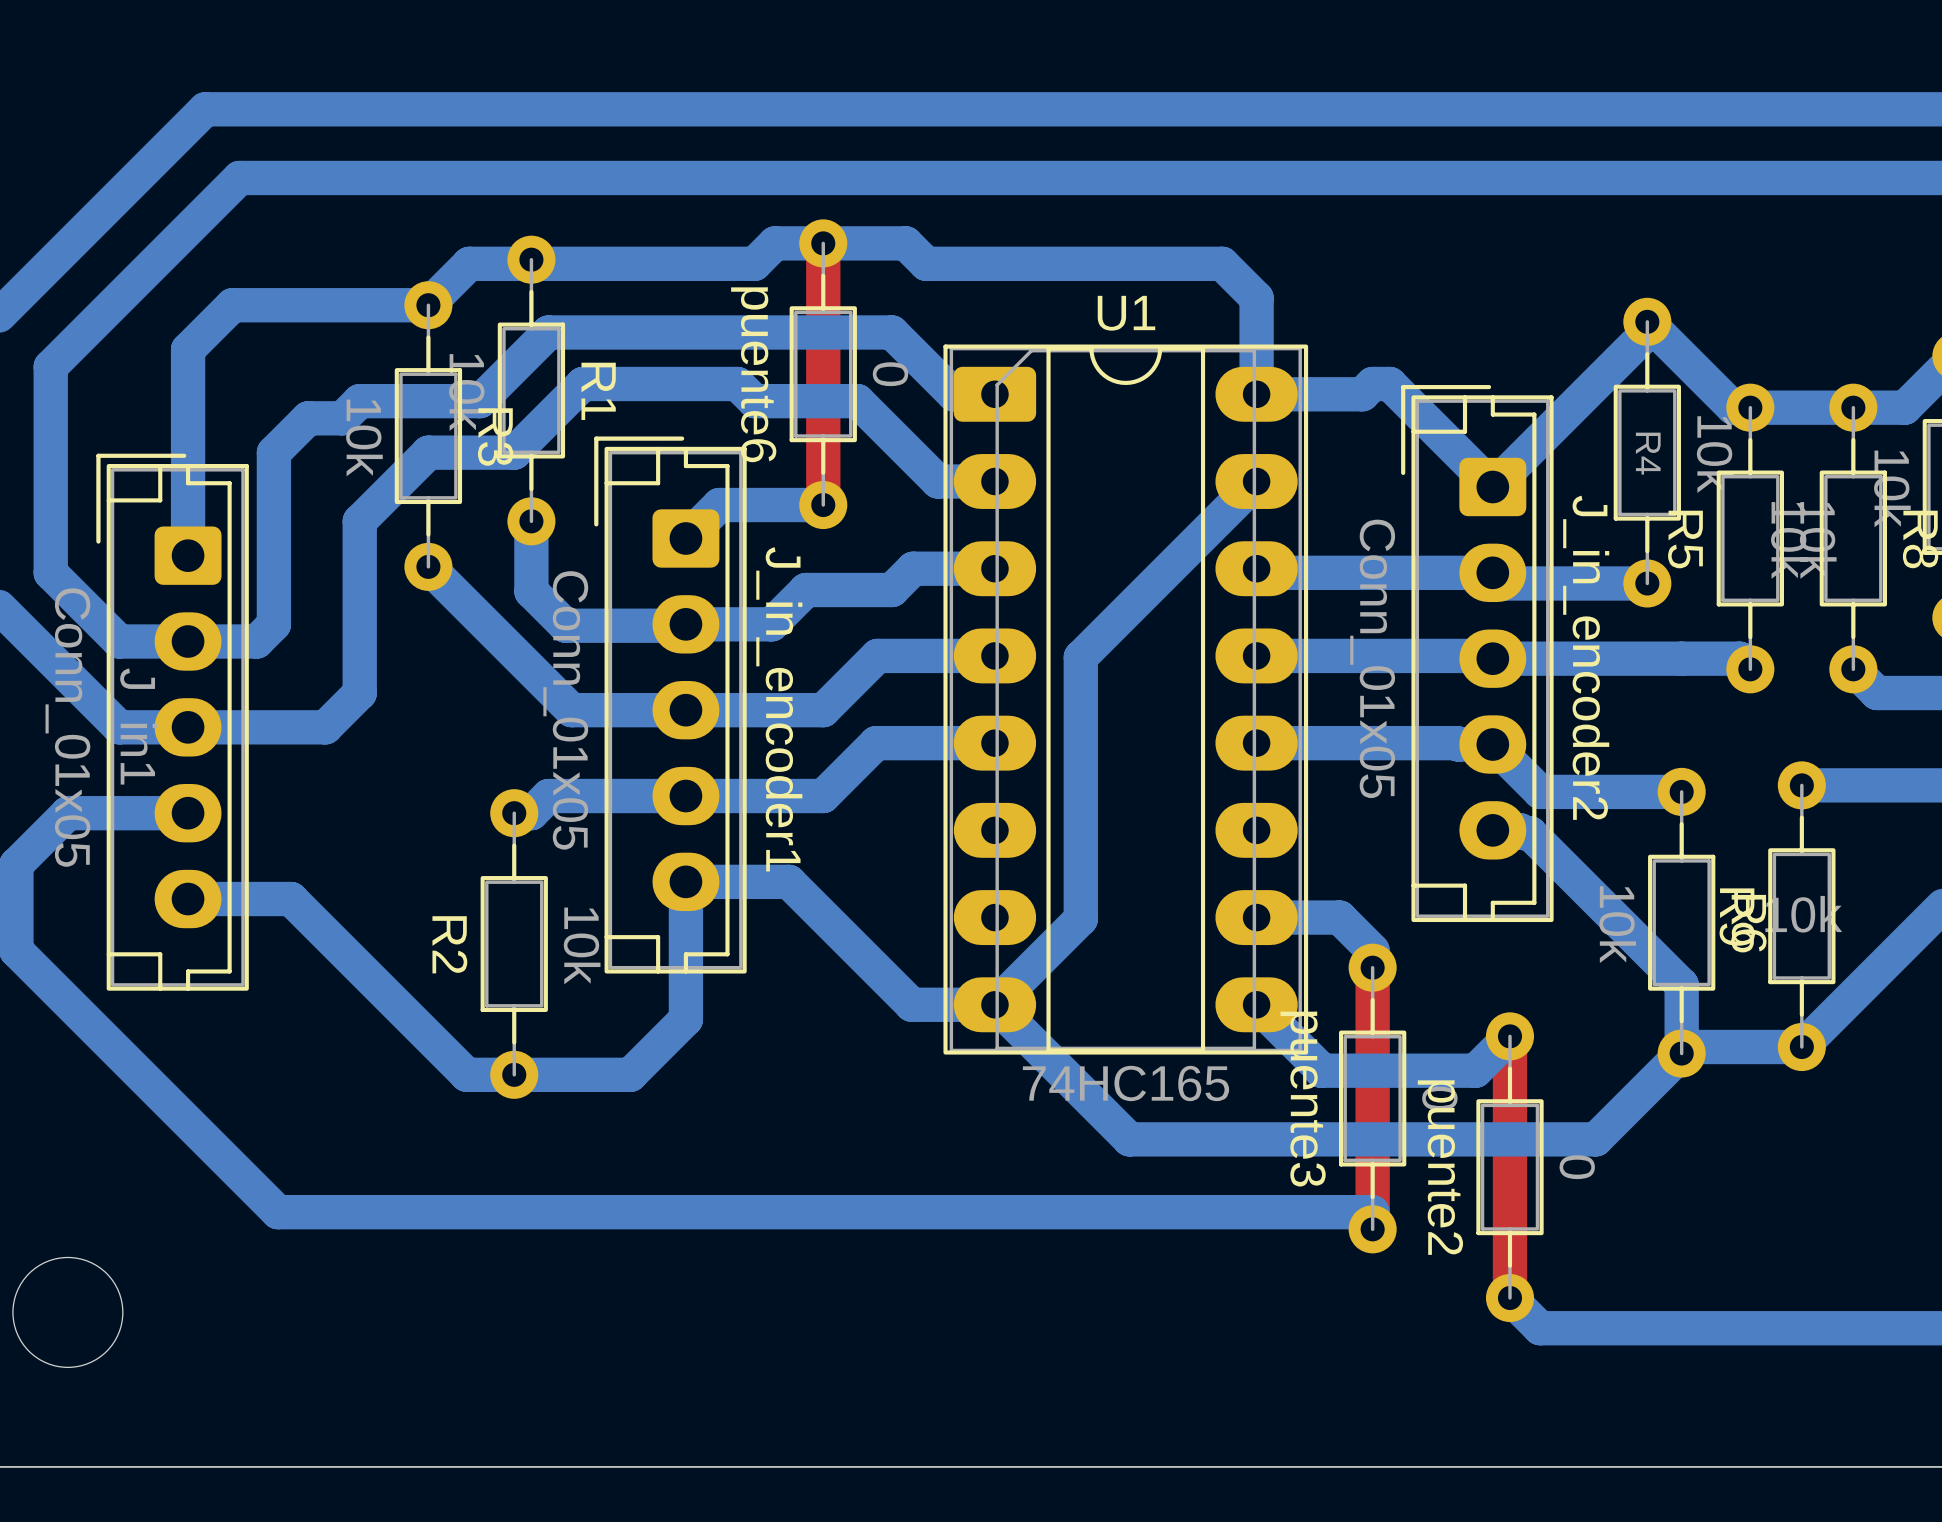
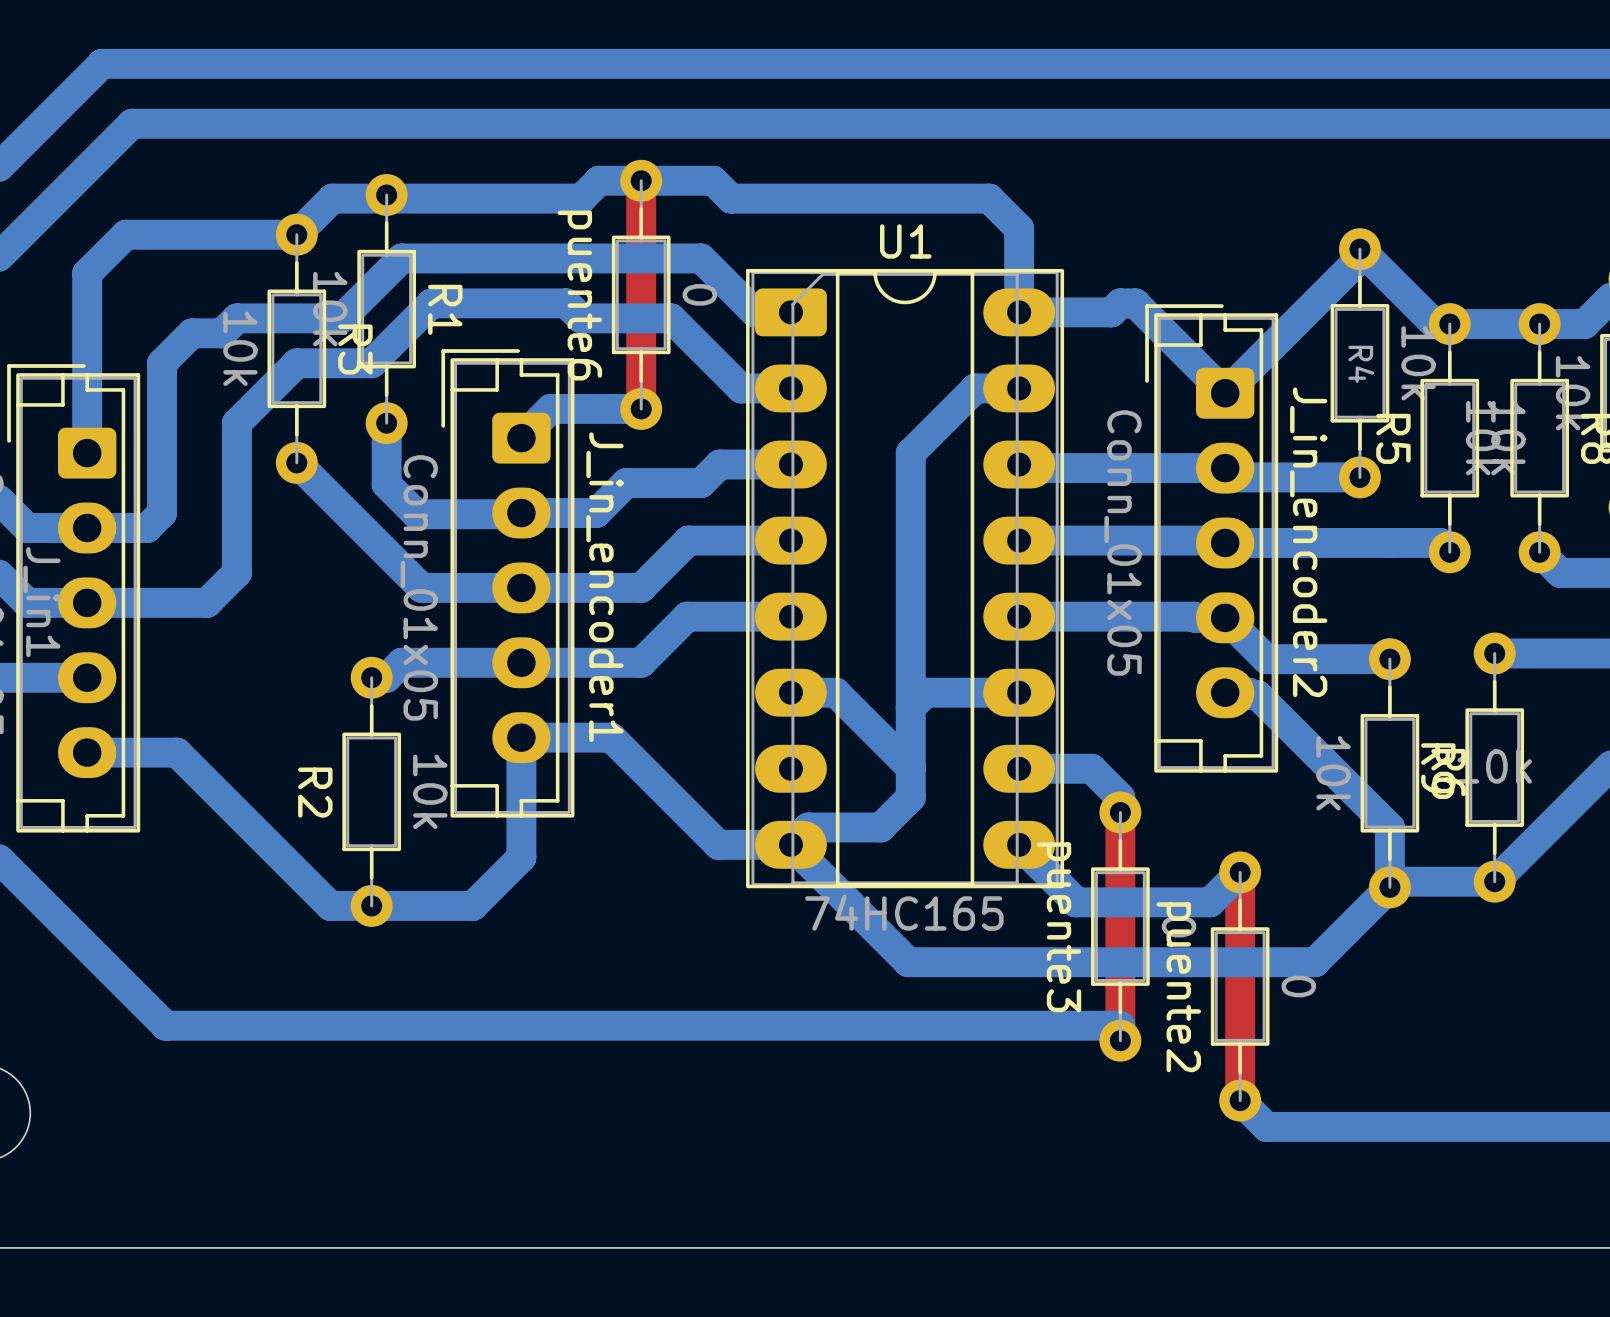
bottom track: (1256, 481) (1080, 657) (1080, 918) (1014, 984) -> (1019, 388) (975, 388) (910, 453) (910, 797) (880, 827) (808, 827)
bottom track: none -> (790, 692) (835, 692) (910, 767)
bottom track: none -> (1019, 692) (925, 692) (910, 707)

